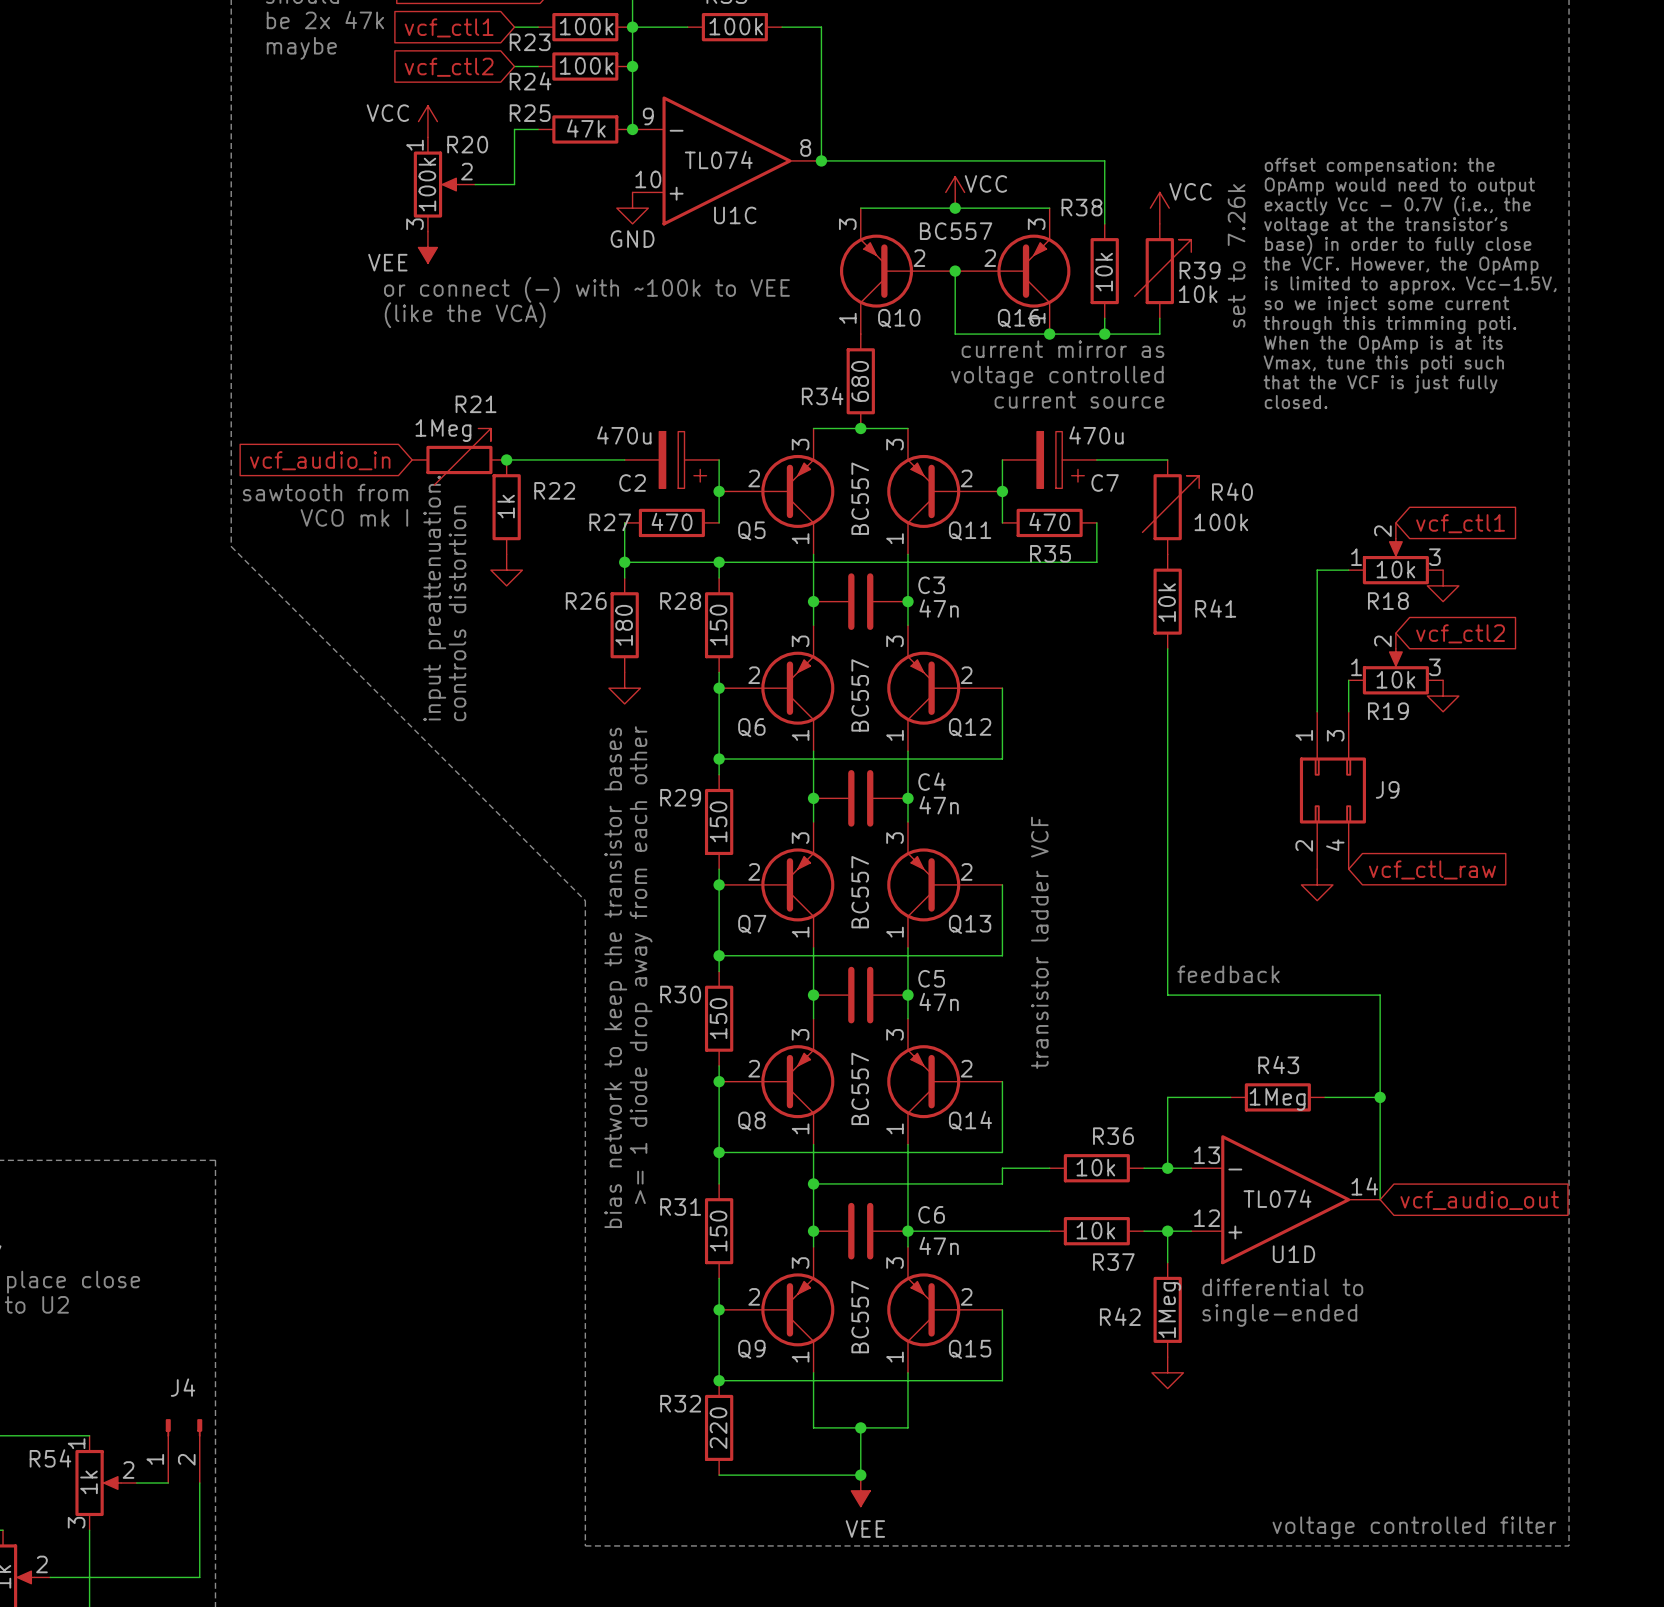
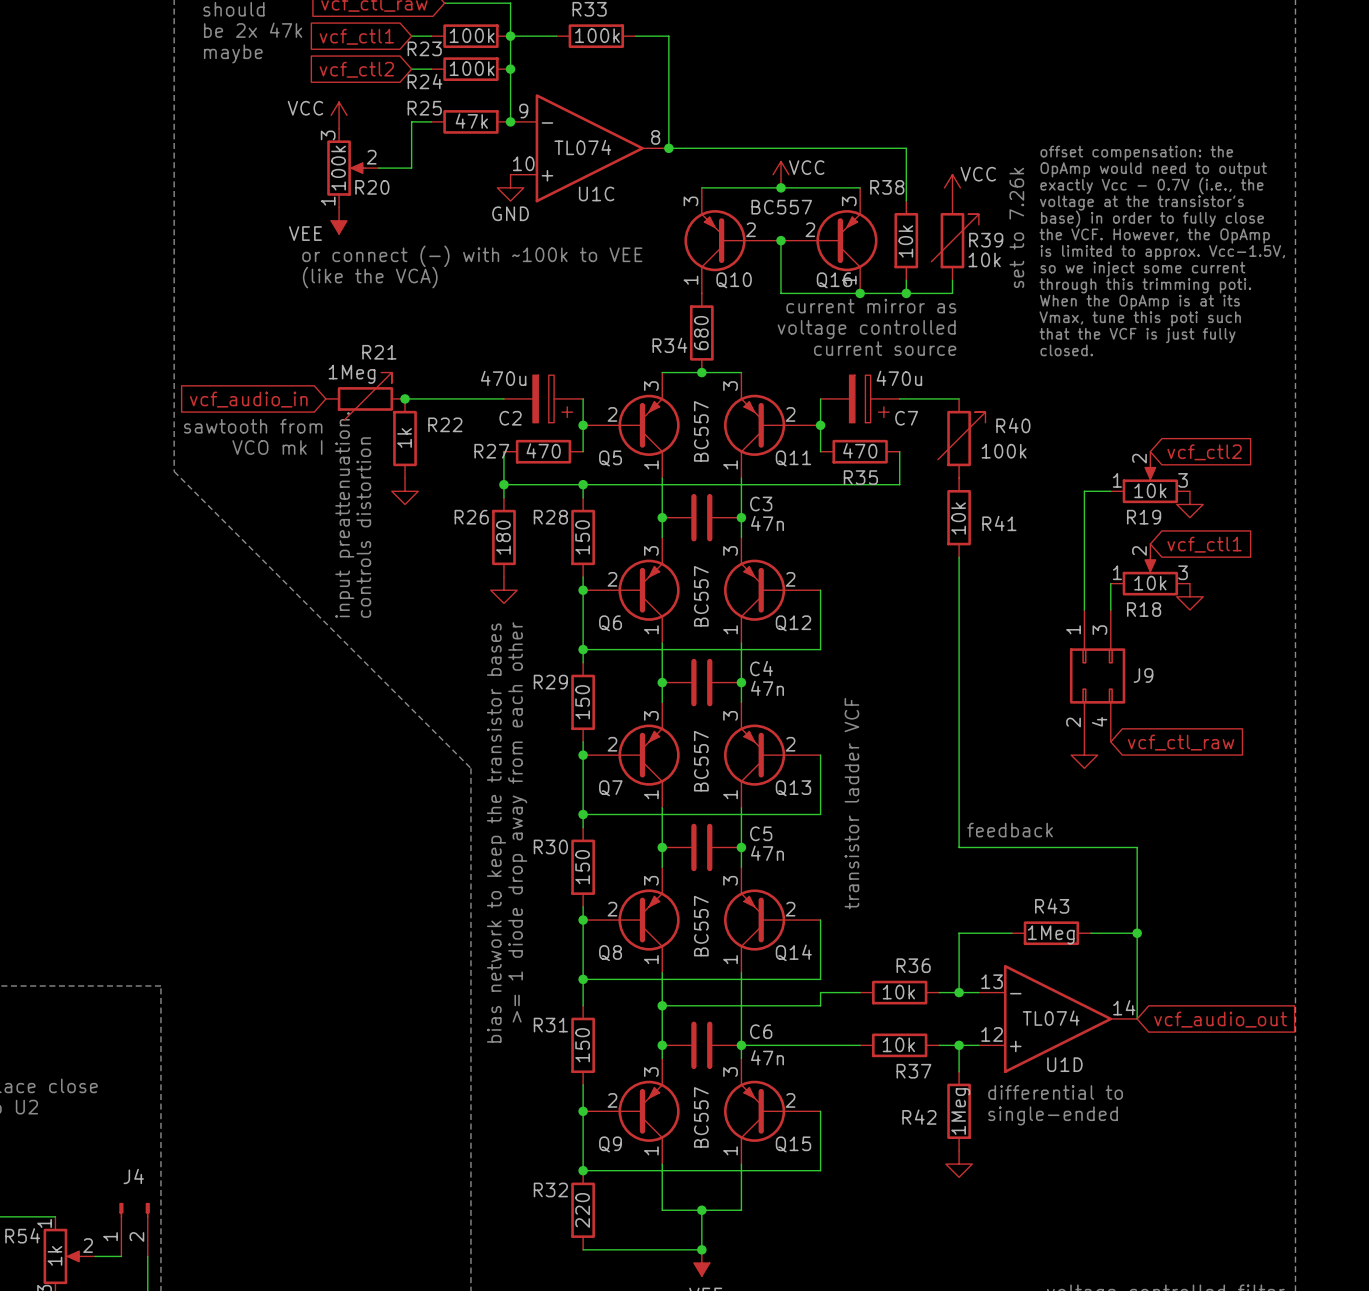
R20 flip: as is (436, 184) -> up-down (346, 168)
global label: vcf_ctl1 (1460, 523) -> vcf_ctl2 (1204, 452)
R18 name: R18 (1388, 601) -> R19 (1144, 517)
global label: vcf_ctl2 (1460, 633) -> vcf_ctl1 (1204, 544)
R19 name: R19 (1388, 711) -> R18 (1144, 609)

